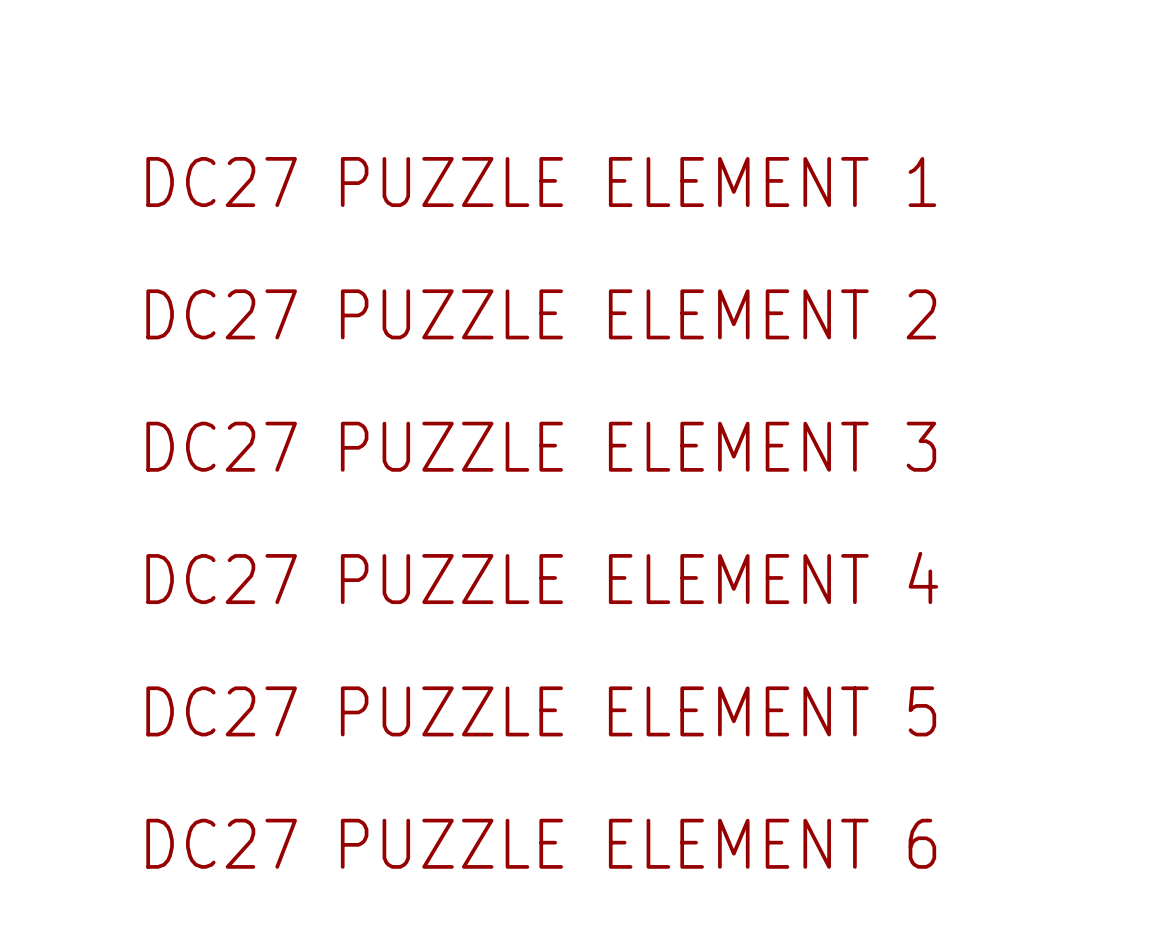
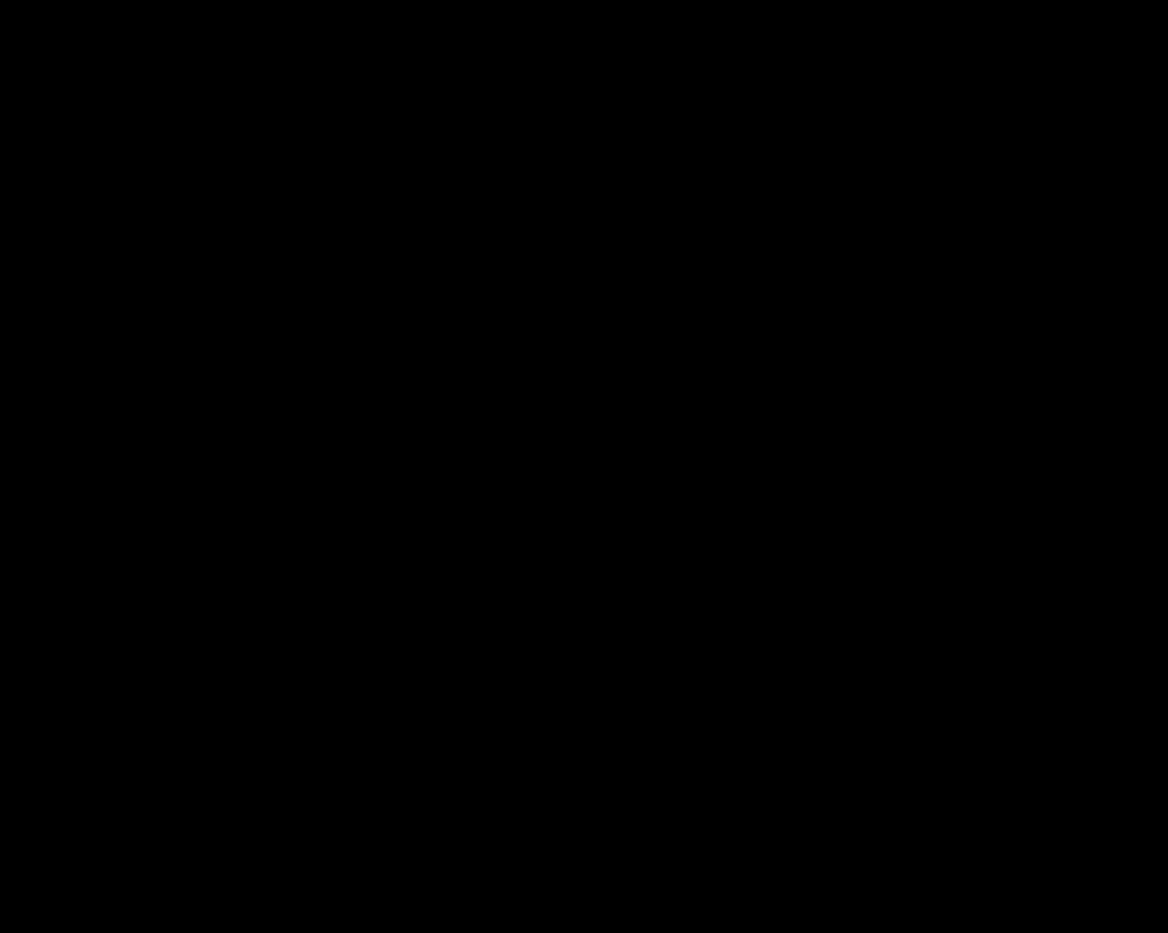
part: (541, 182) -> none
part: (541, 314) -> none
part: (541, 446) -> none
part: (542, 577) -> none
part: (541, 711) -> none
part: (541, 843) -> none

